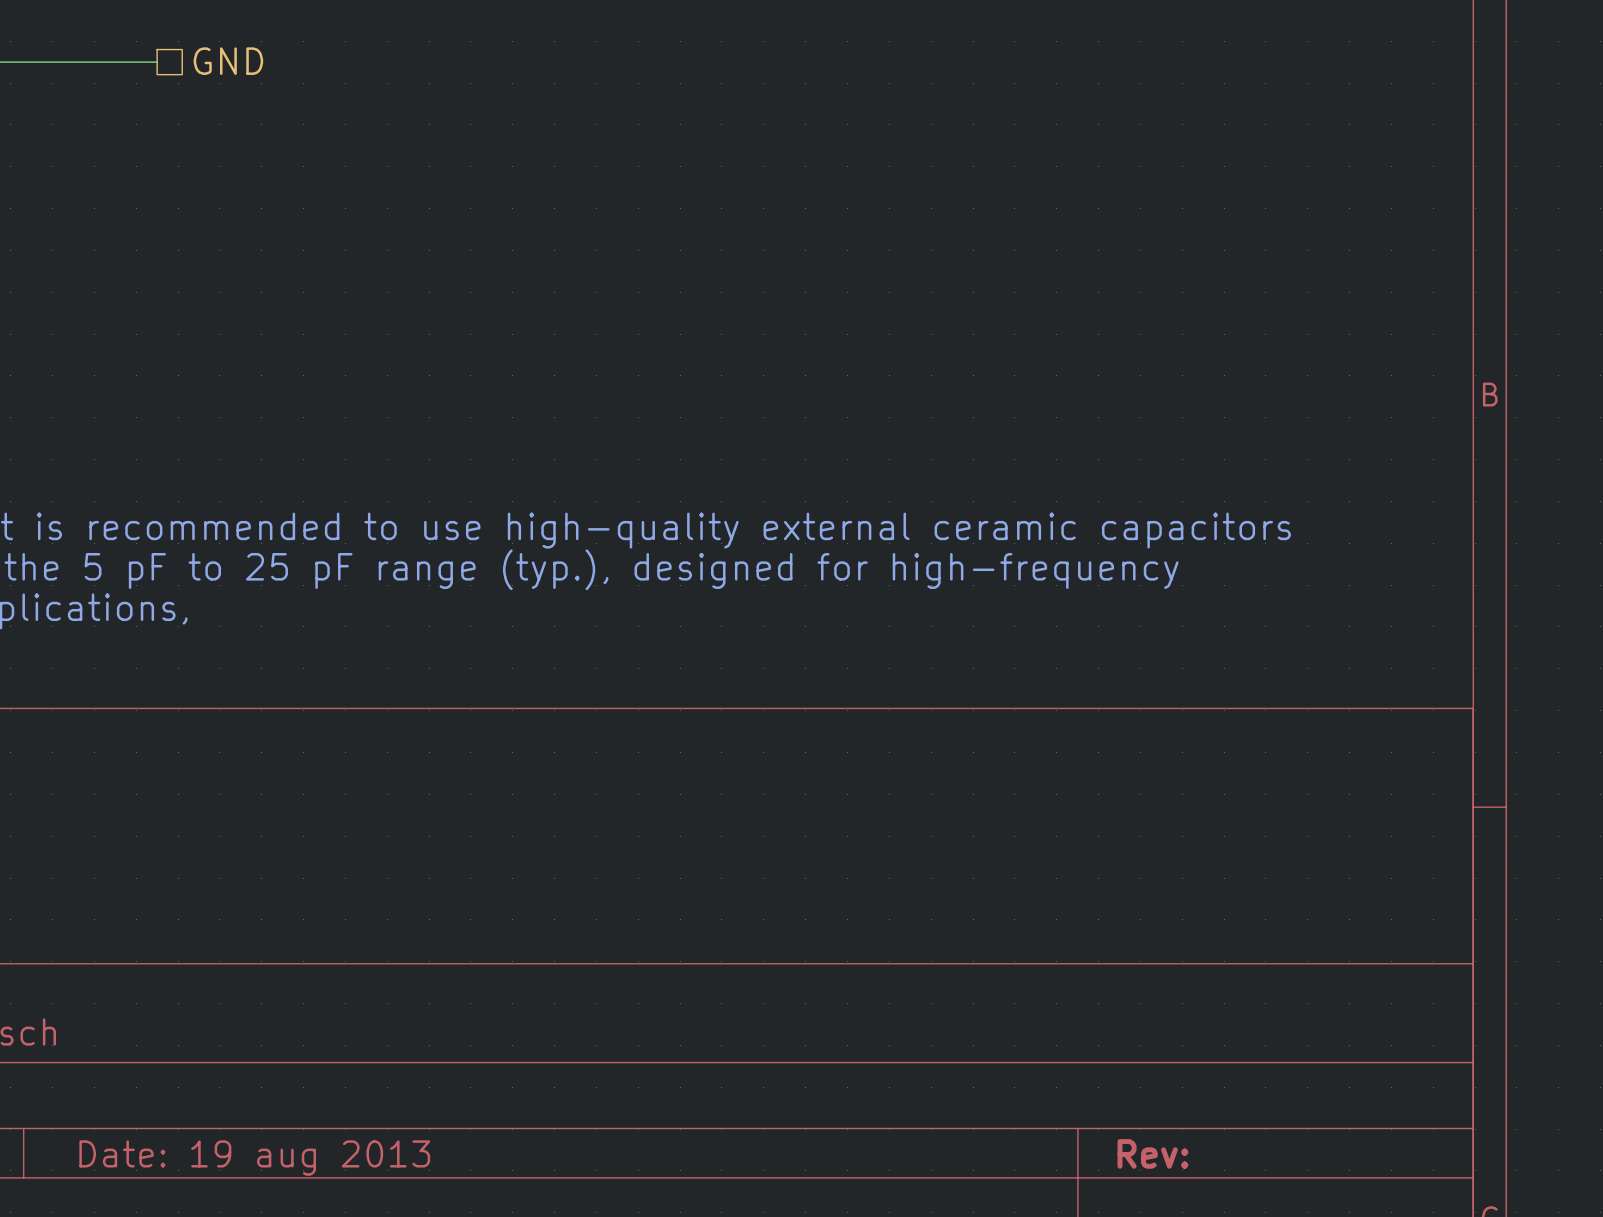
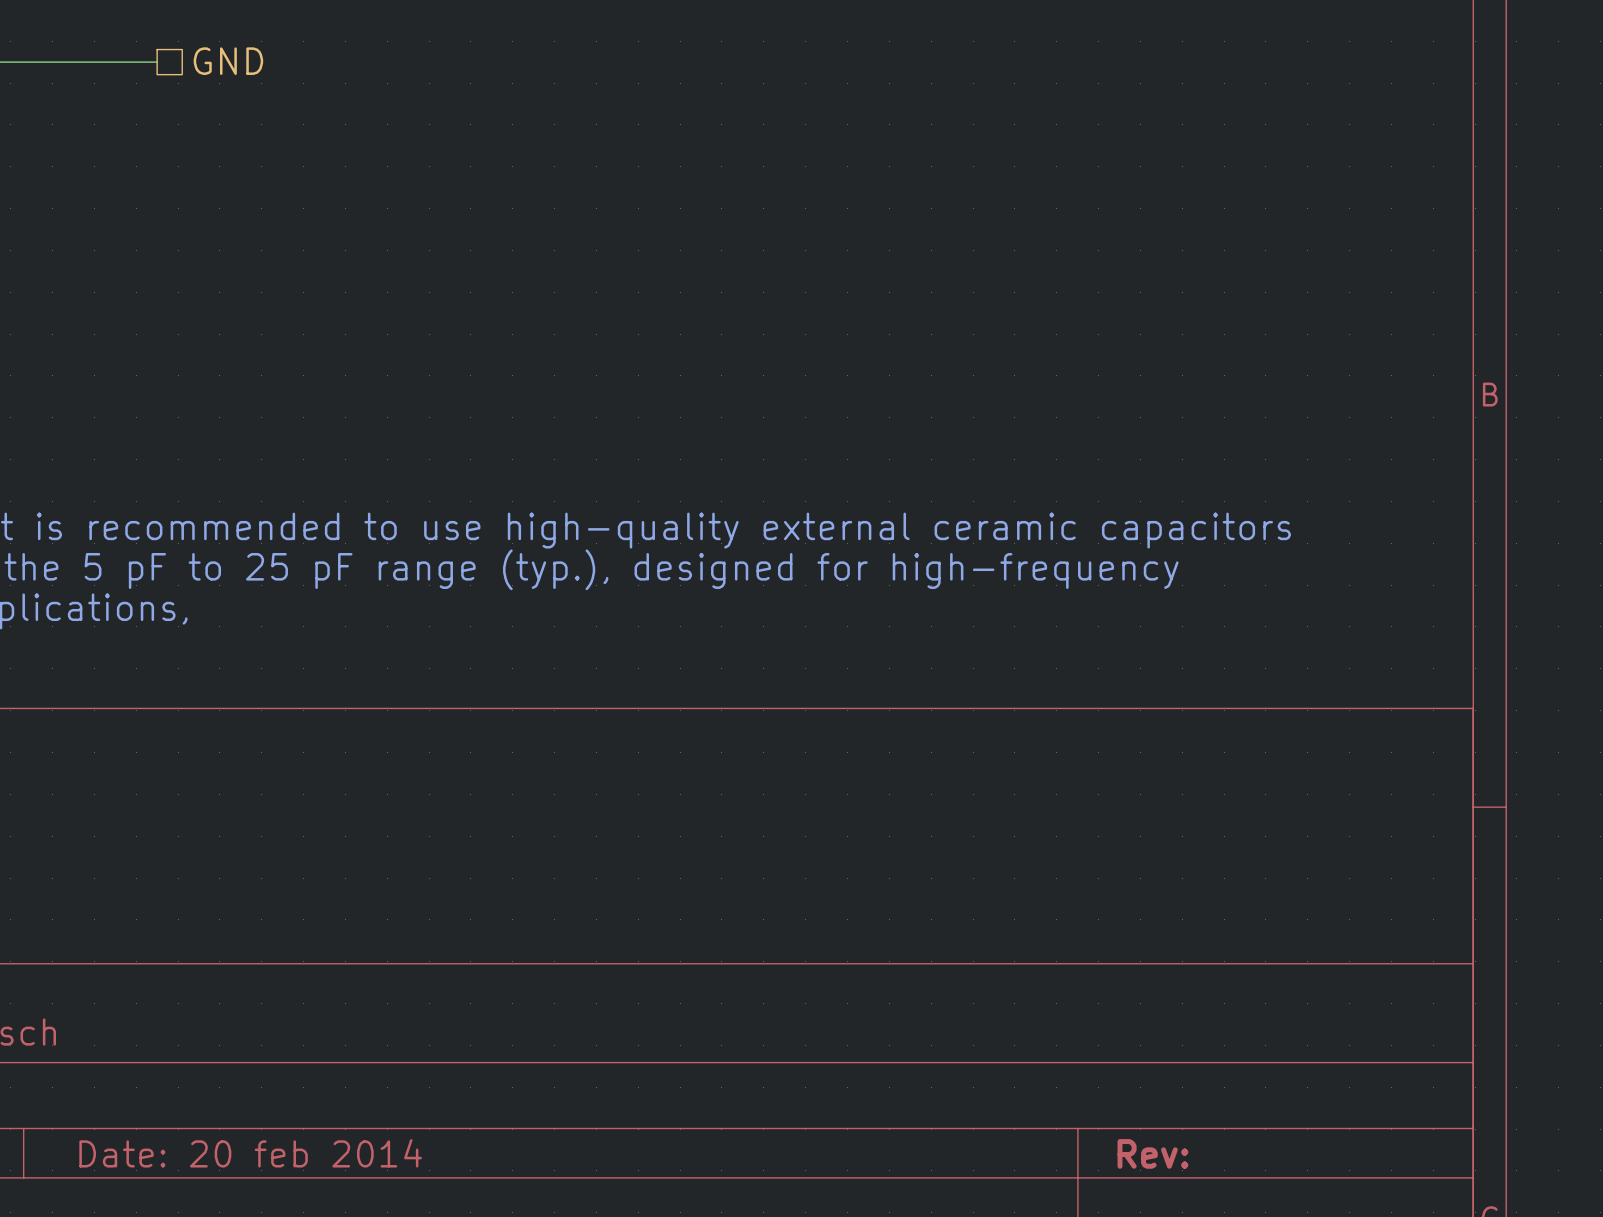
title block: Date: 19 aug 2013 (254, 1158) -> Date: 20 feb 2014 (250, 1153)

